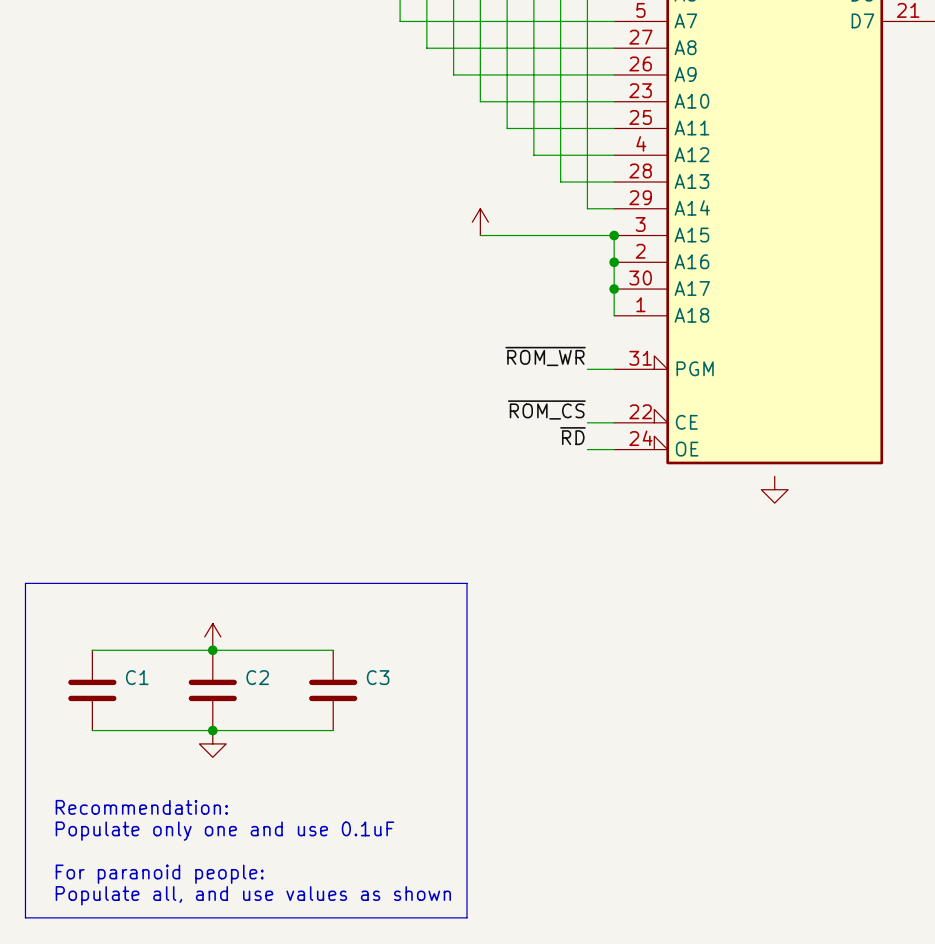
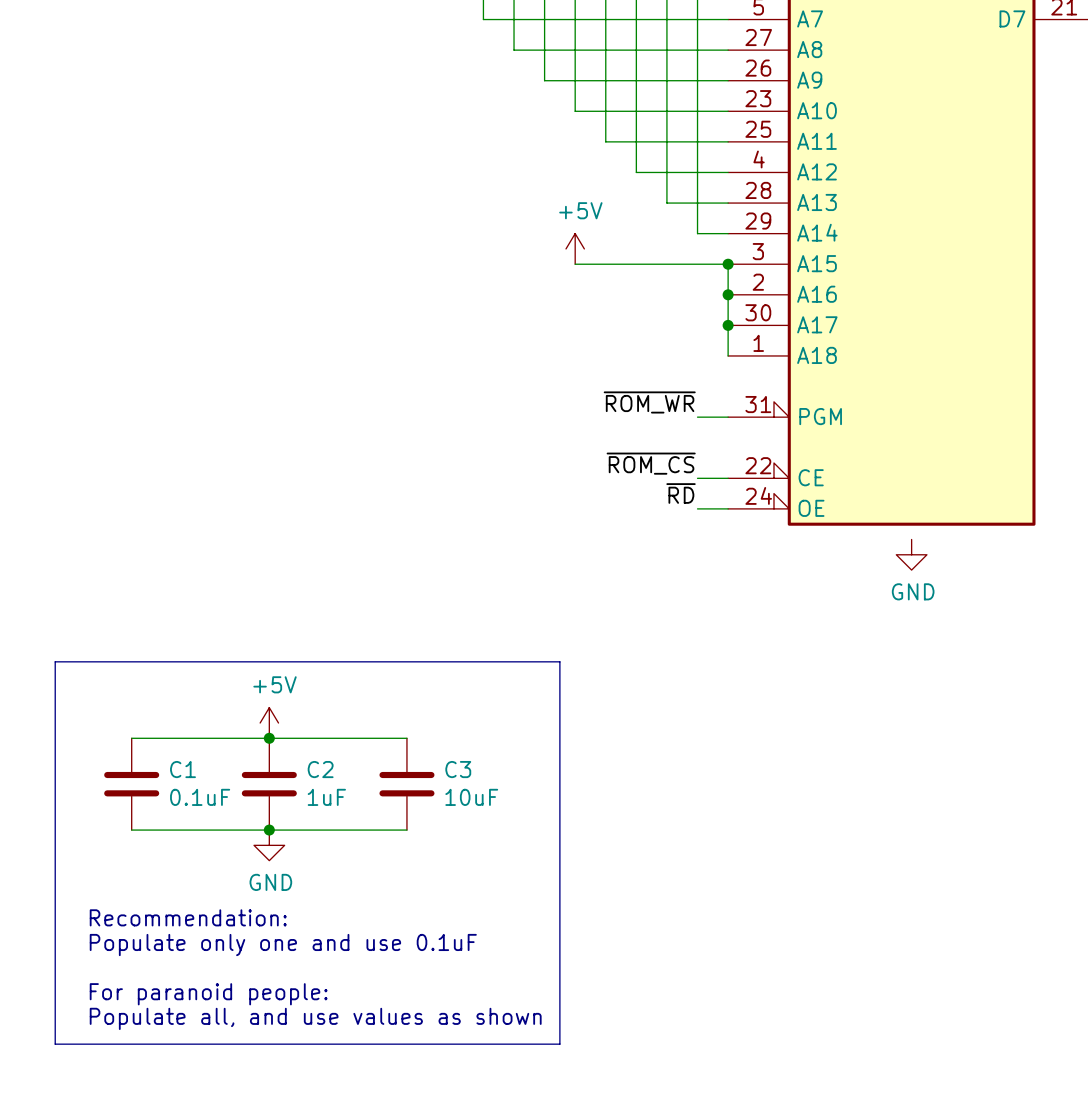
power symbol text: none -> +5V (580, 210)
power symbol text: none -> GND (913, 591)
power symbol text: none -> +5V (275, 684)
C1 value: none -> 0.1uF (200, 797)
C2 value: none -> 1uF (326, 797)
C3 value: none -> 10uF (471, 797)
power symbol text: none -> GND (270, 882)

